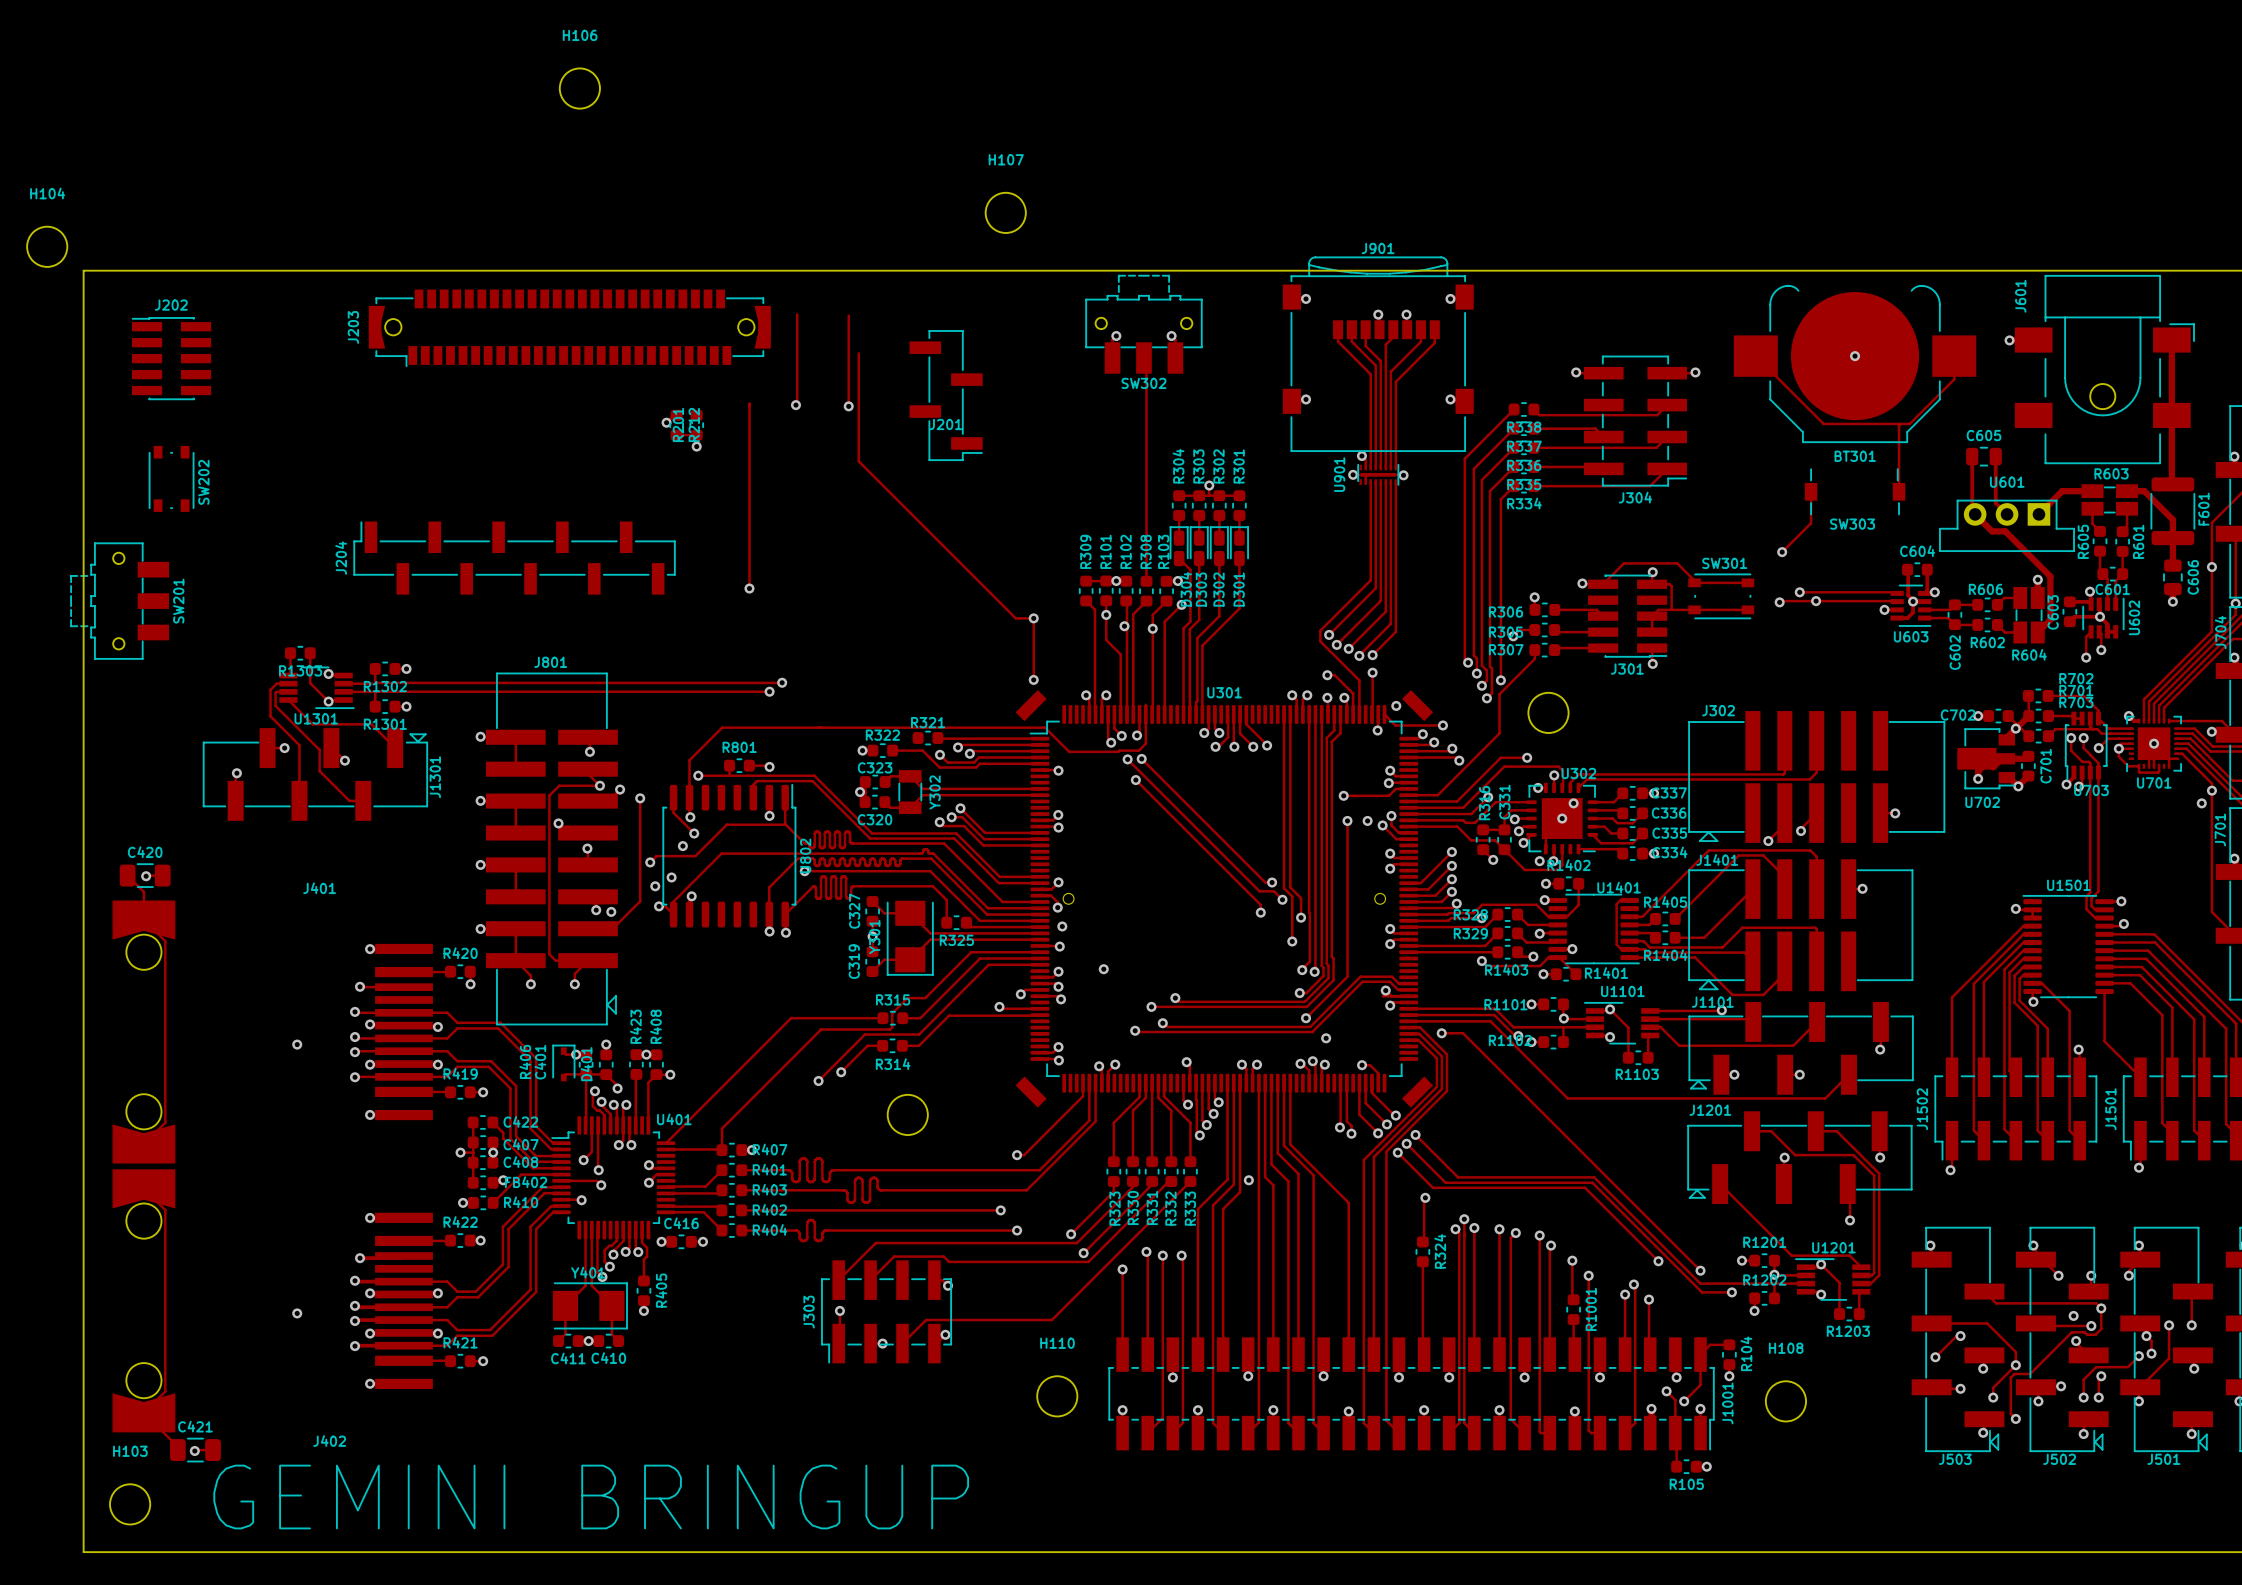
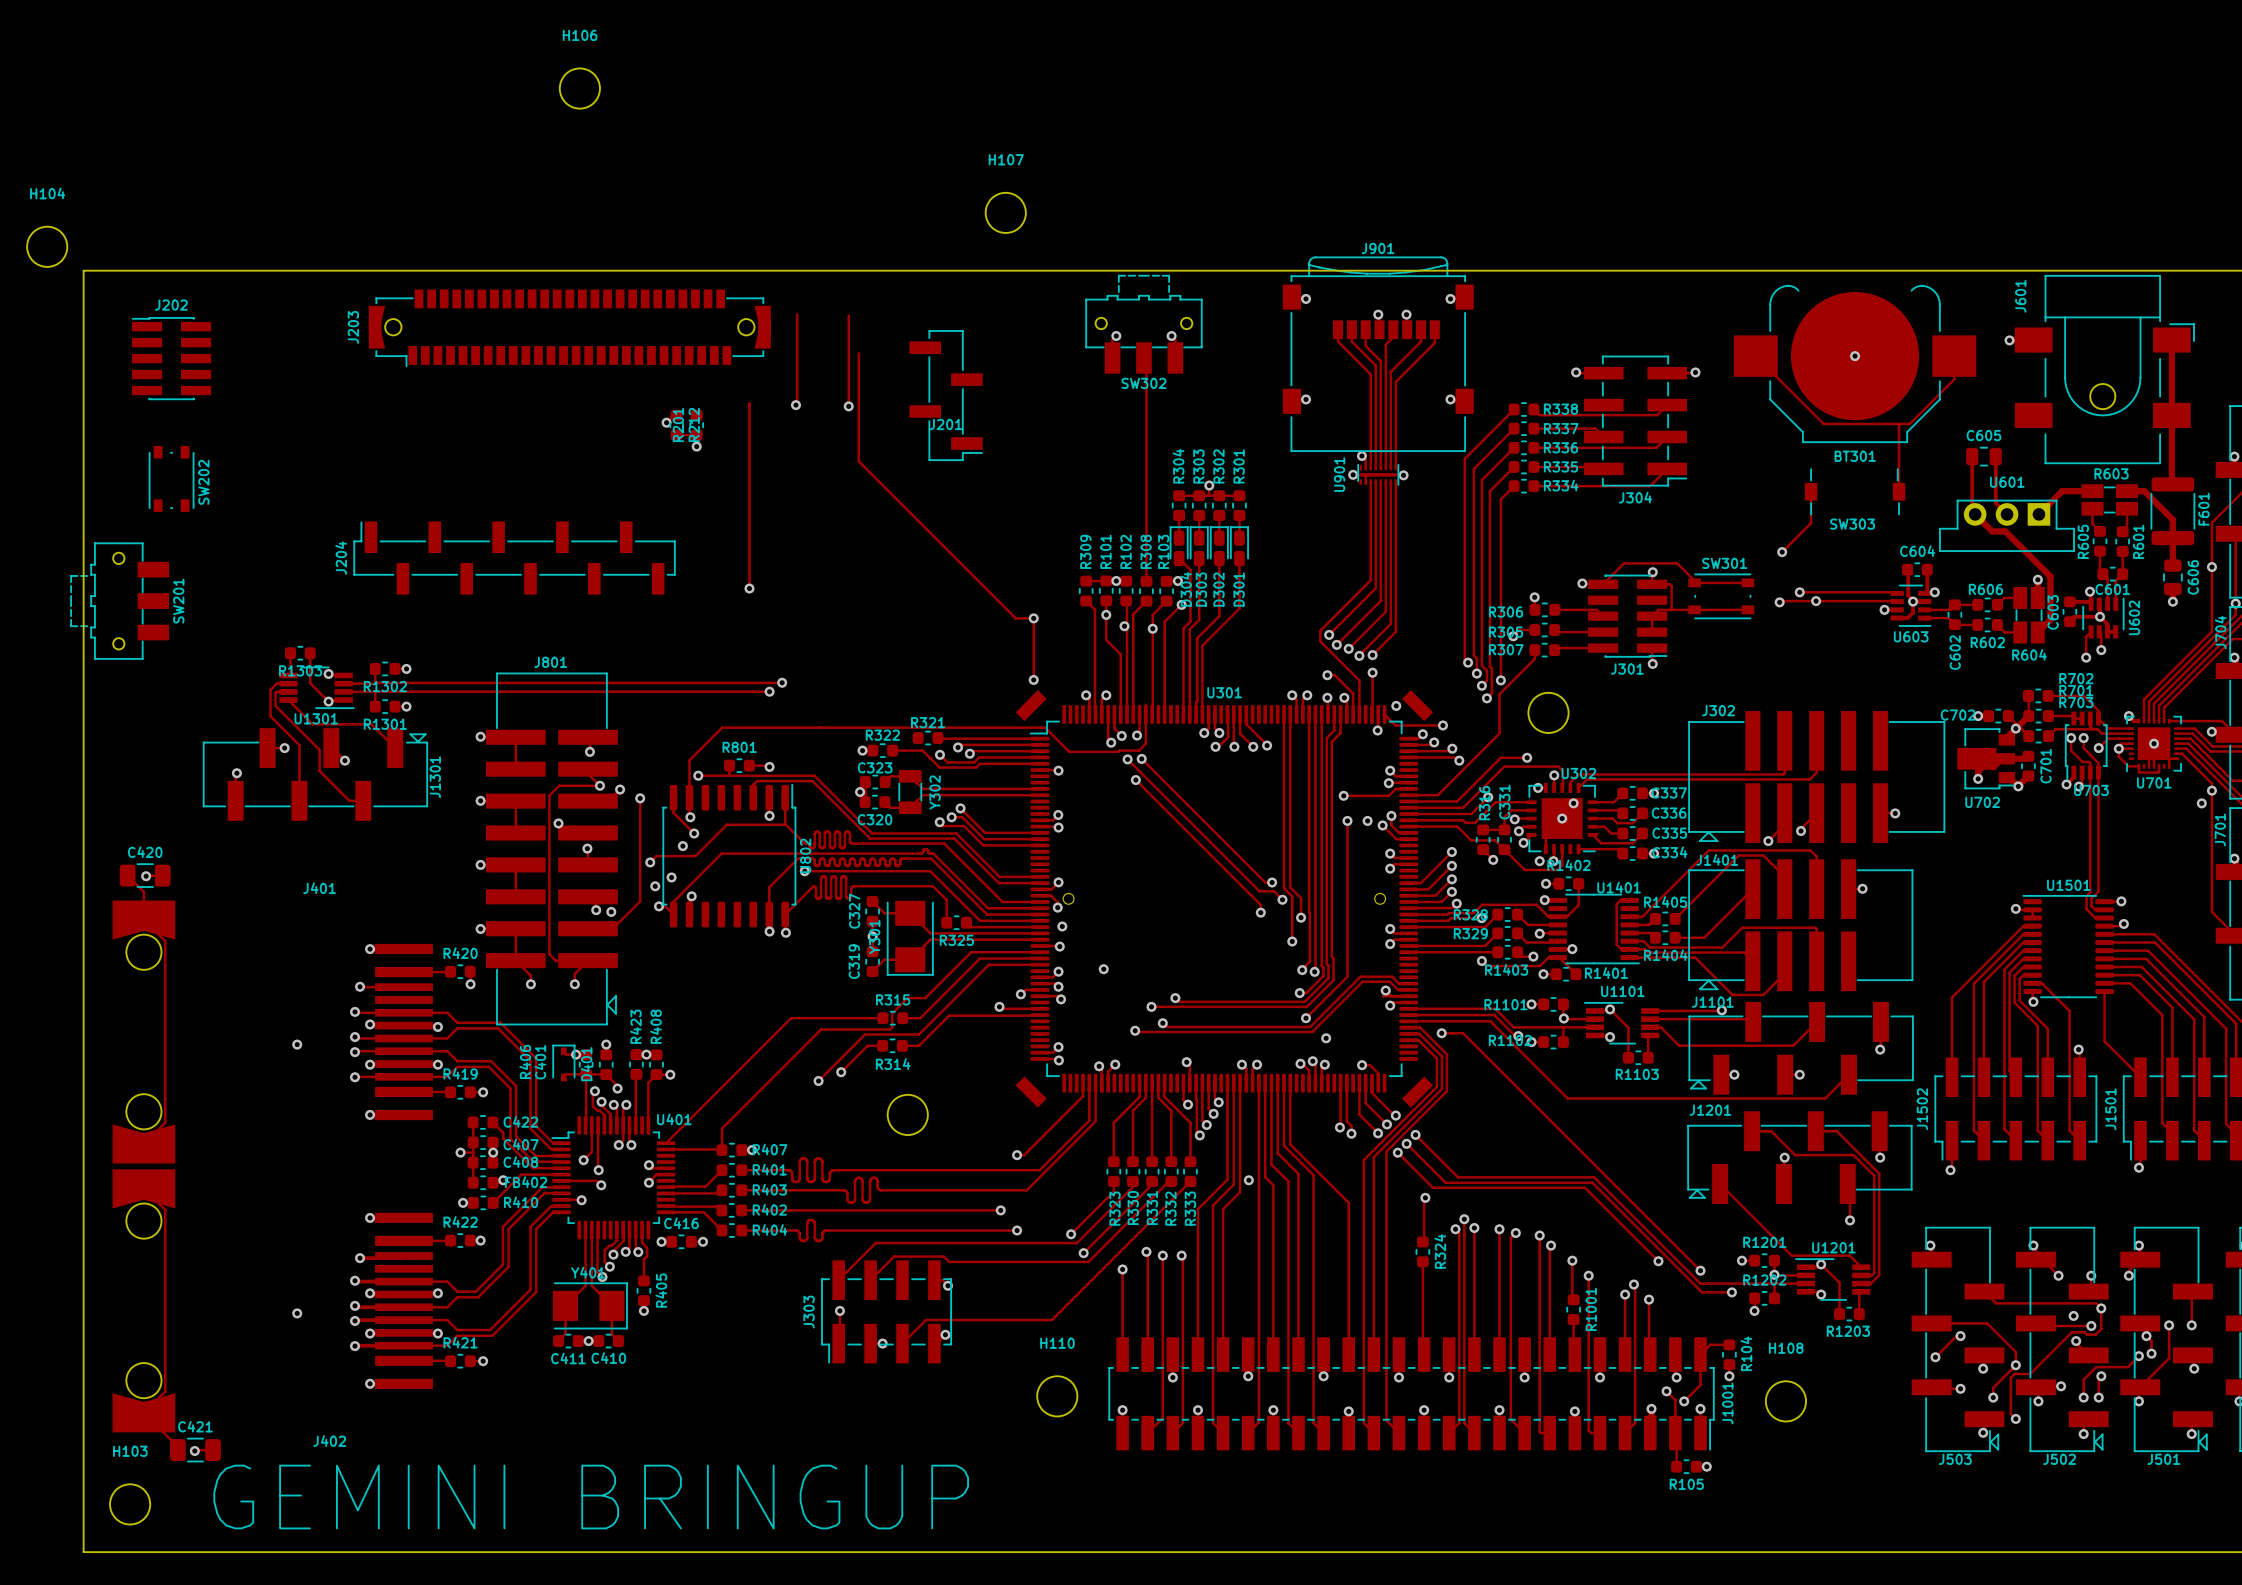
R338 name position: R338 (1524, 427) -> R338 (1560, 409)
R337 name position: R337 (1524, 446) -> R337 (1561, 428)
R336 name position: R336 (1524, 465) -> R336 (1560, 447)
R335 name position: R335 (1524, 484) -> R335 (1560, 466)
R334 name position: R334 (1524, 503) -> R334 (1561, 485)

